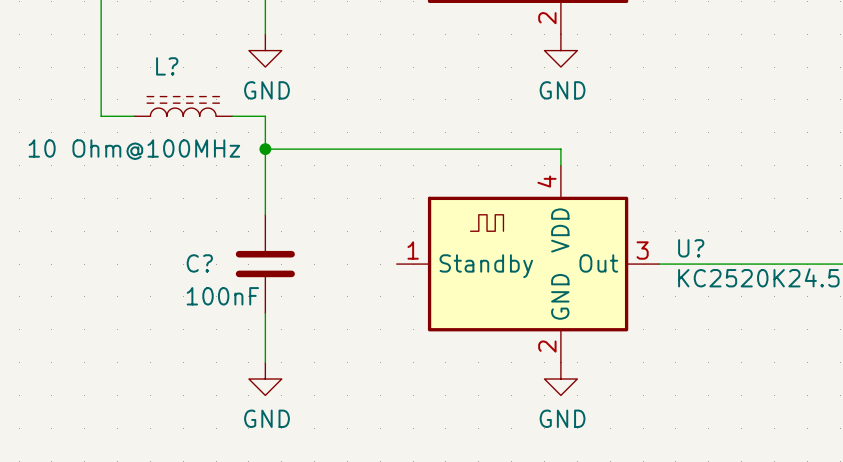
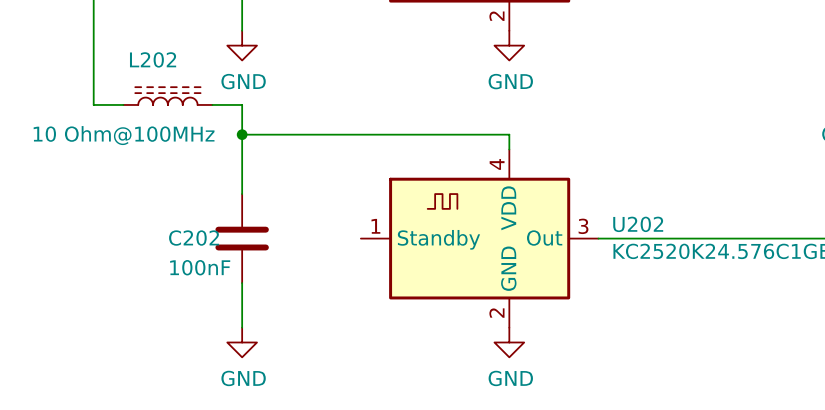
L? name: L? (167, 66) -> L202 (153, 59)
U? name: U? (691, 248) -> U202 (638, 224)
C? name: C? (199, 263) -> C202 (194, 238)

